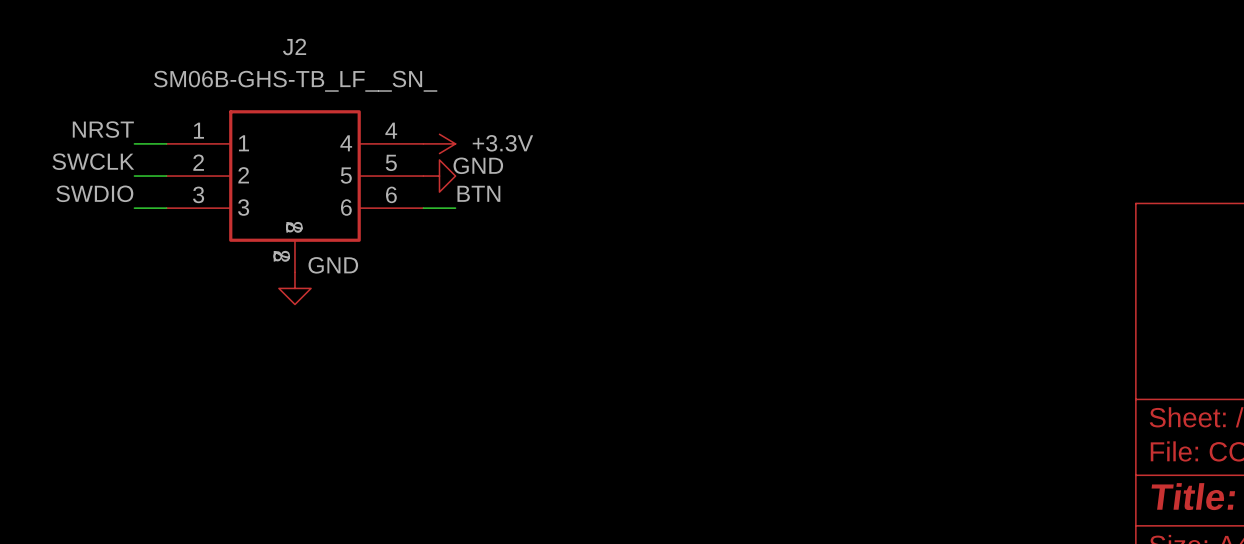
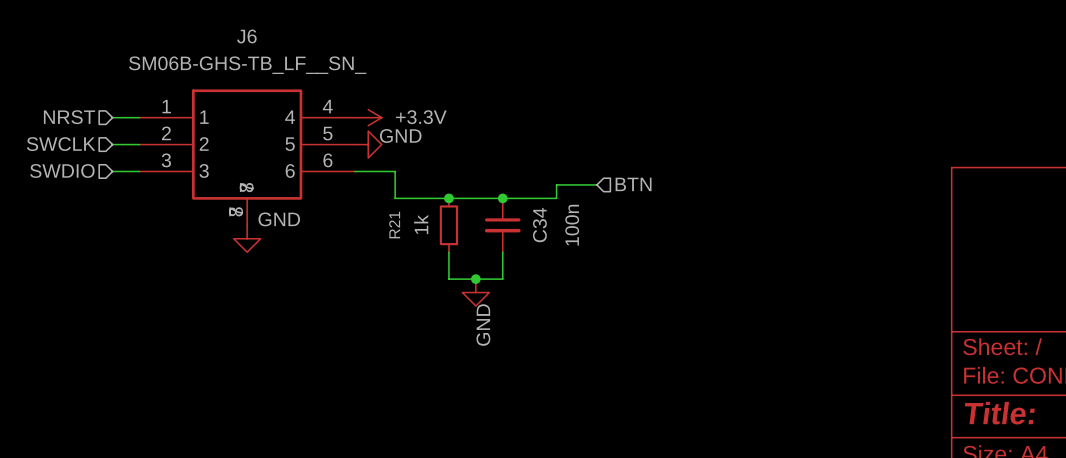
J2 name: J2 (294, 46) -> J6 (246, 36)
label: NRST (103, 129) -> none
hierarchical label: none -> NRST (69, 117)
label: SWCLK (93, 161) -> none
hierarchical label: none -> SWCLK (61, 144)
label: SWDIO (94, 193) -> none
label: BTN (478, 193) -> none
hierarchical label: none -> SWDIO (62, 170)
wire: none -> (381, 171) (395, 171) (395, 198) (556, 198) (556, 184) (596, 184)
hierarchical label: none -> BTN (633, 184)
junction: none -> (448, 198)
junction: none -> (502, 198)
R21: none -> 1k (448, 225)
C34: none -> 100n (502, 225)
wire: none -> (448, 252) (448, 279) (502, 279) (502, 252)
junction: none -> (475, 279)
power symbol: none -> GND (475, 292)

